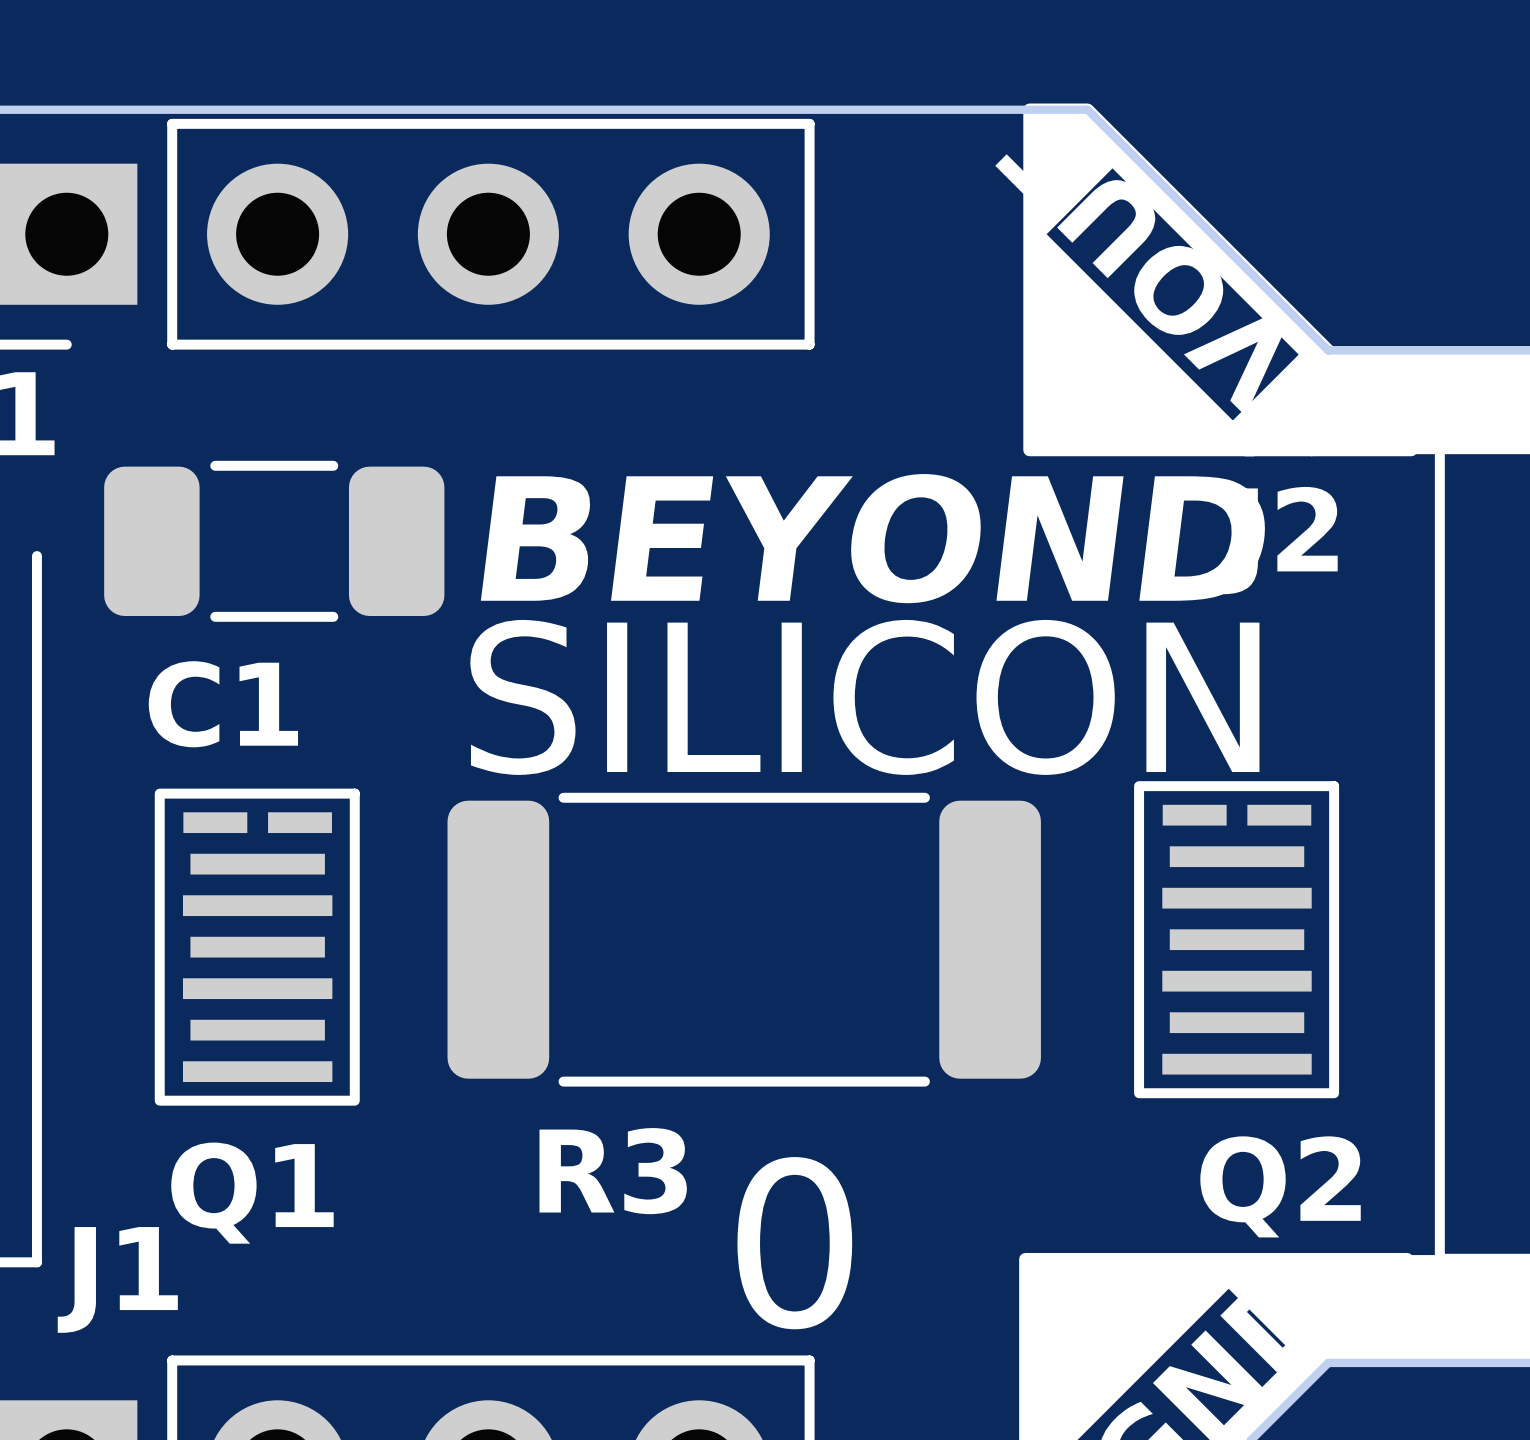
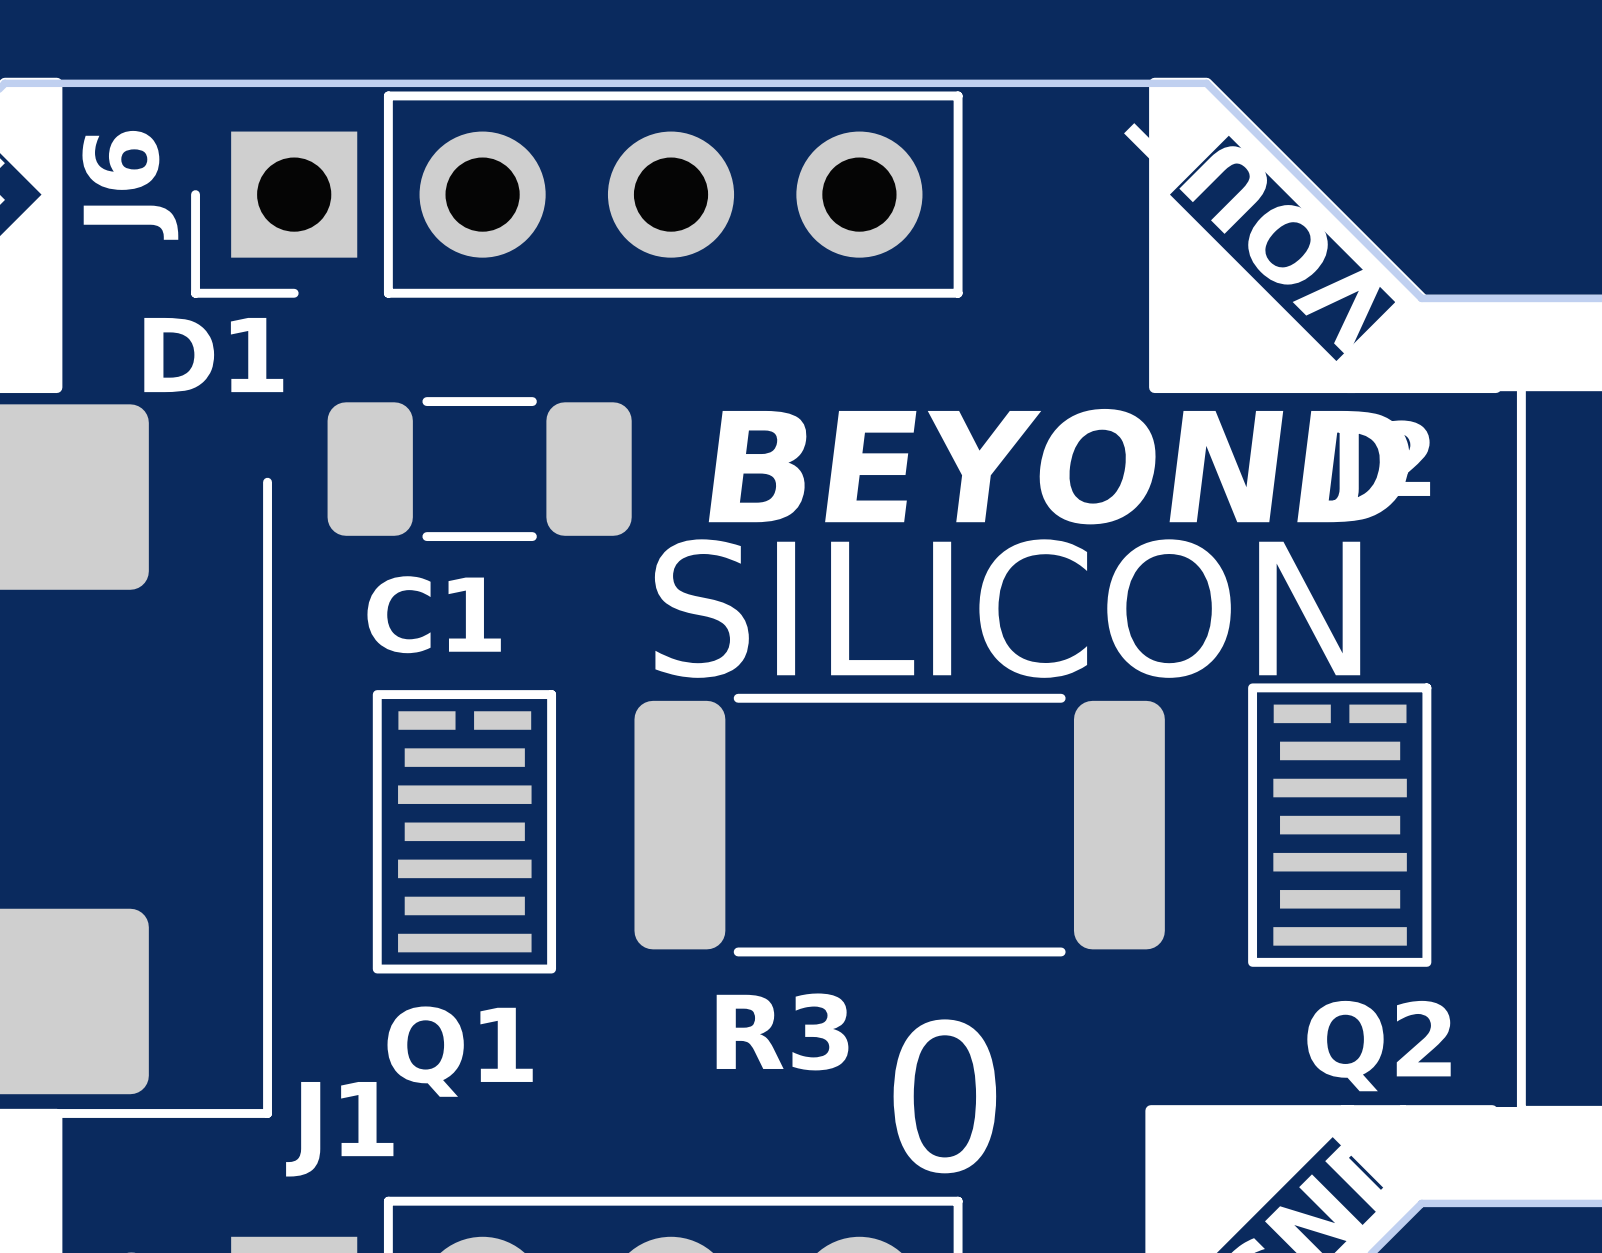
text position: BEYOND (873, 538) -> BEYOND (1059, 466)

